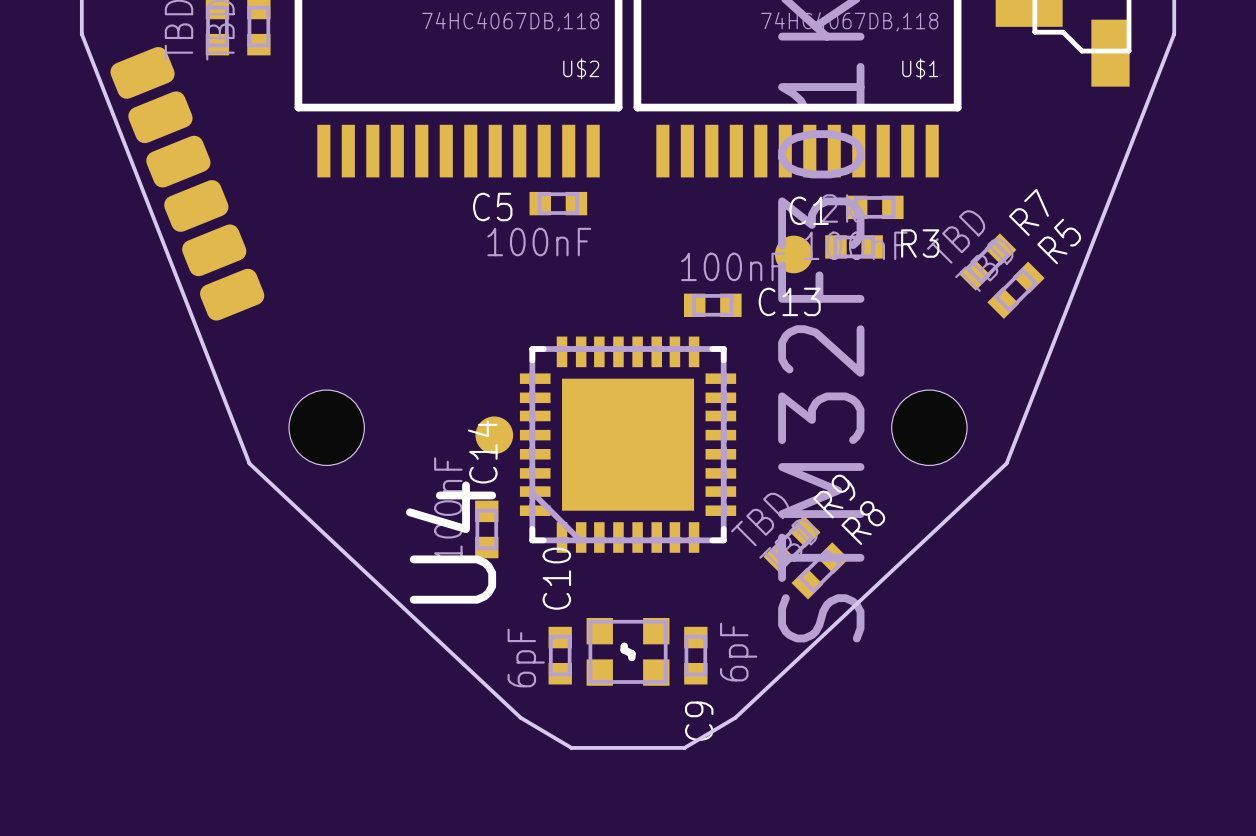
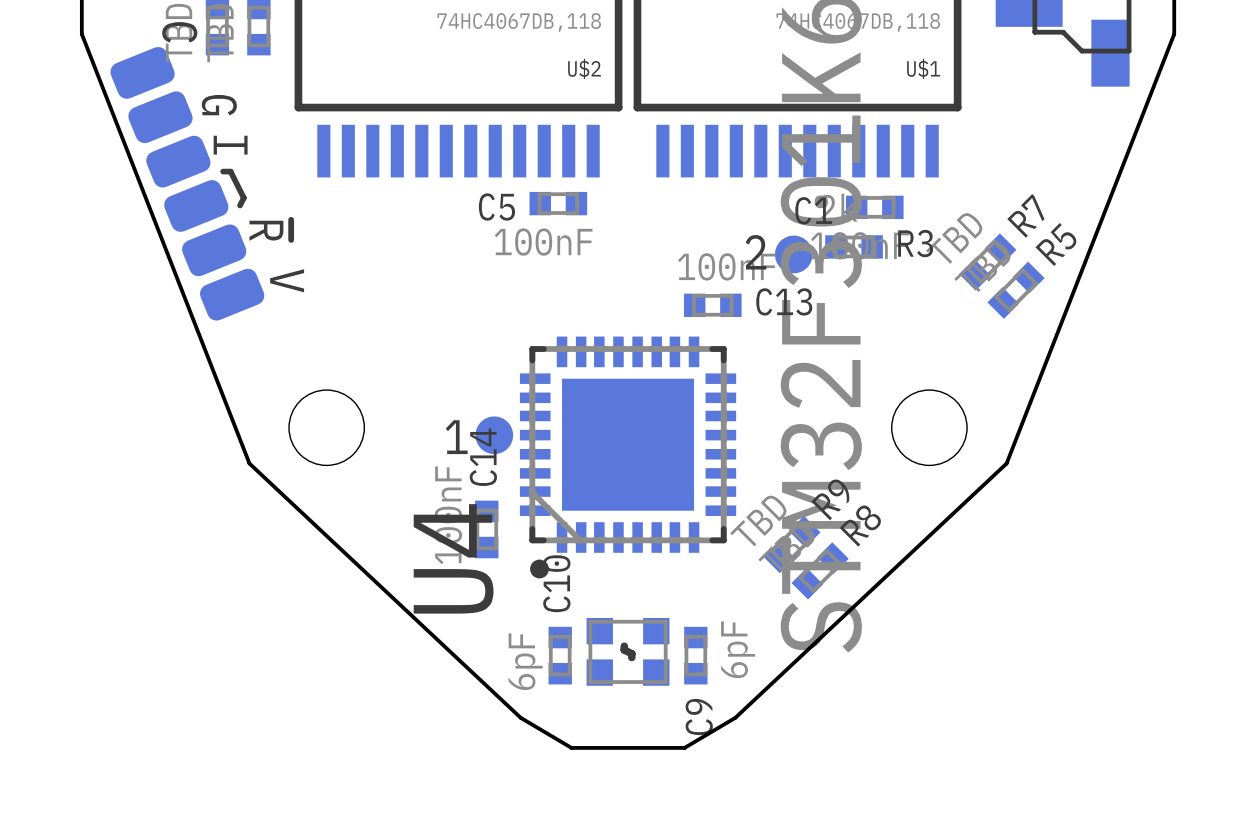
text: none -> C (179, 32)
text: none -> G (219, 105)
text: none -> I (230, 145)
line: none -> (223, 171) (230, 171) (243, 197) (240, 205)
text: none -> ~{R} (270, 230)
text: none -> 2 (756, 252)
text: none -> V (287, 280)
text: none -> 1 (456, 437)
drawing: none -> [530, 559, 549, 579]

